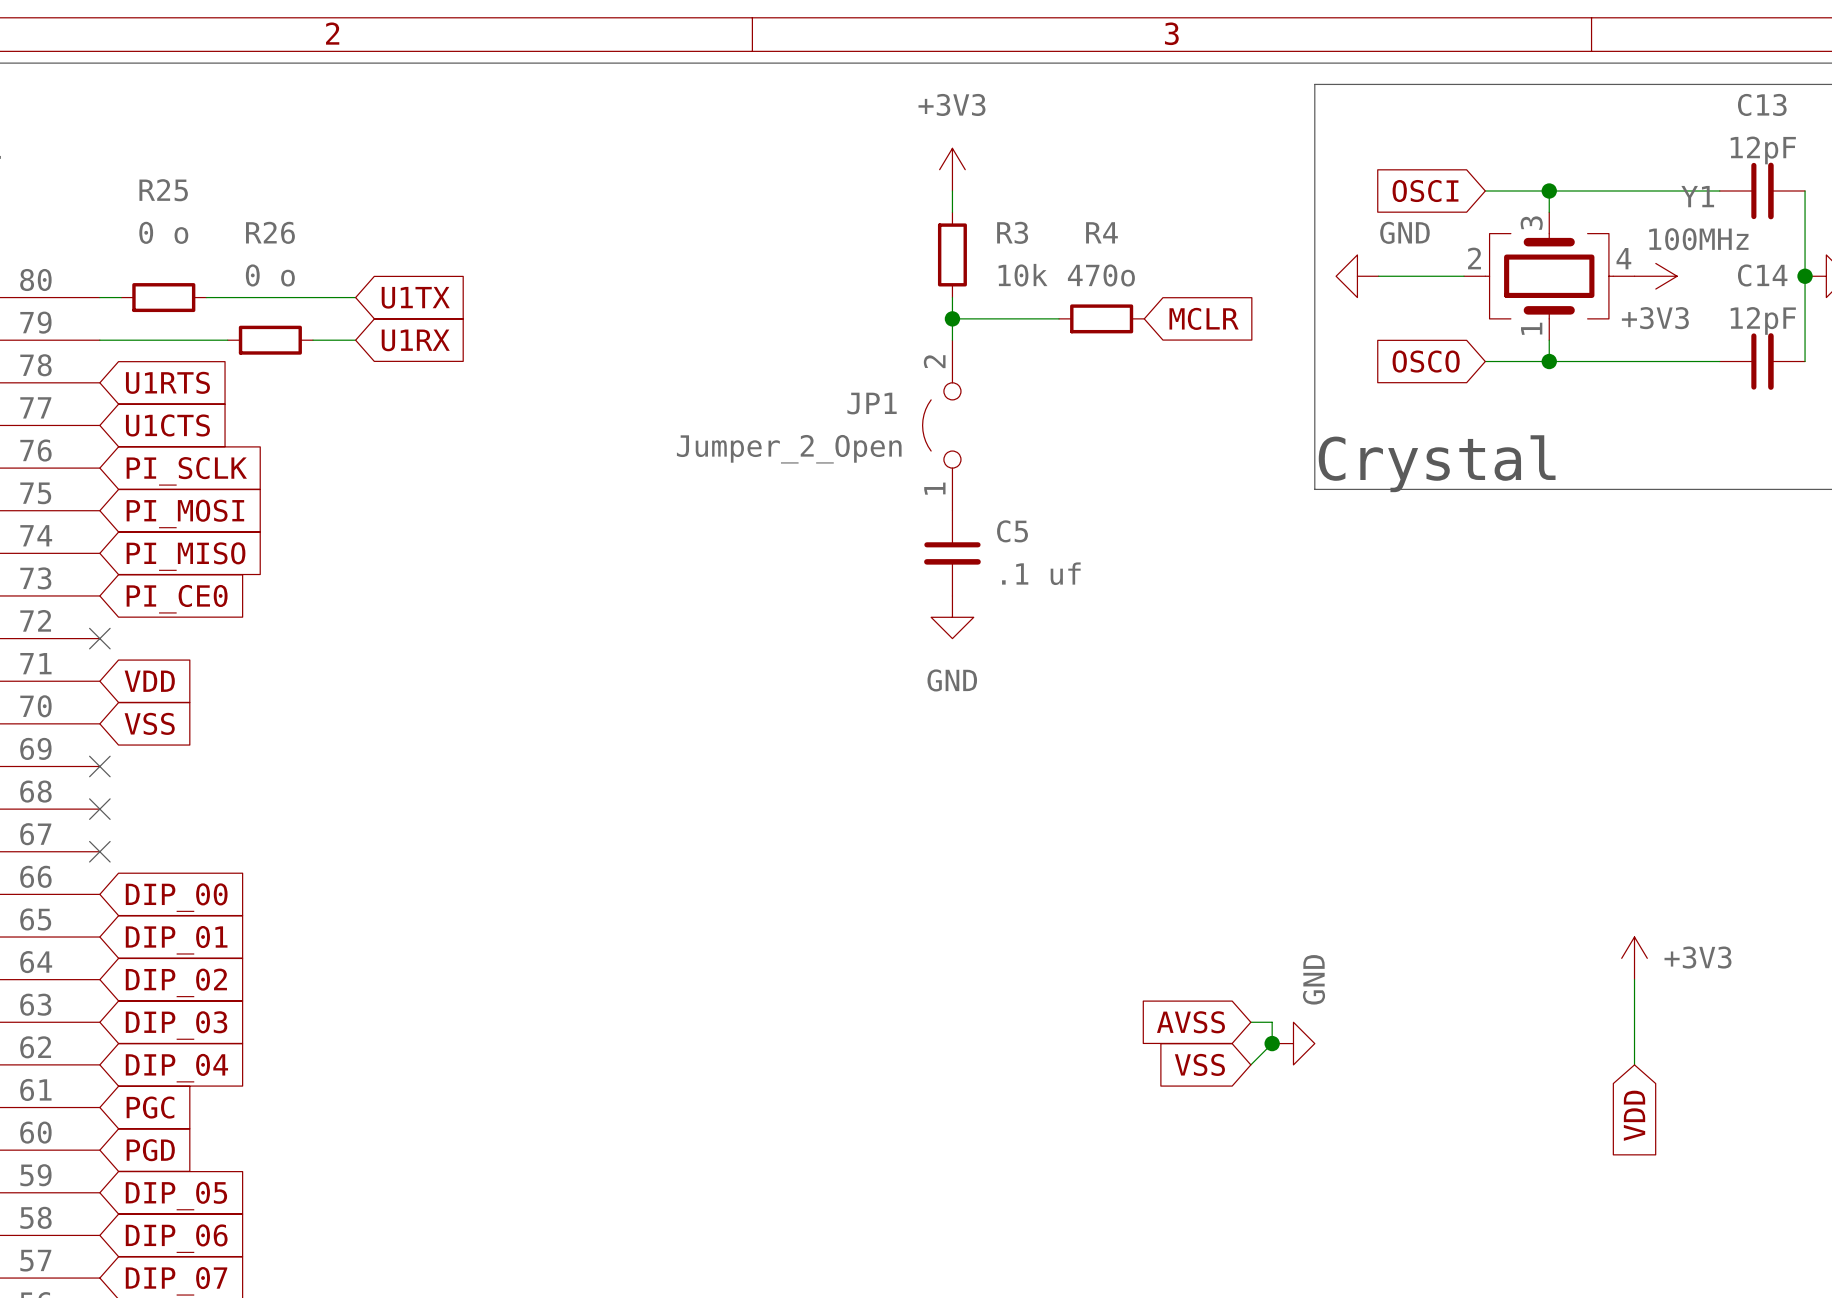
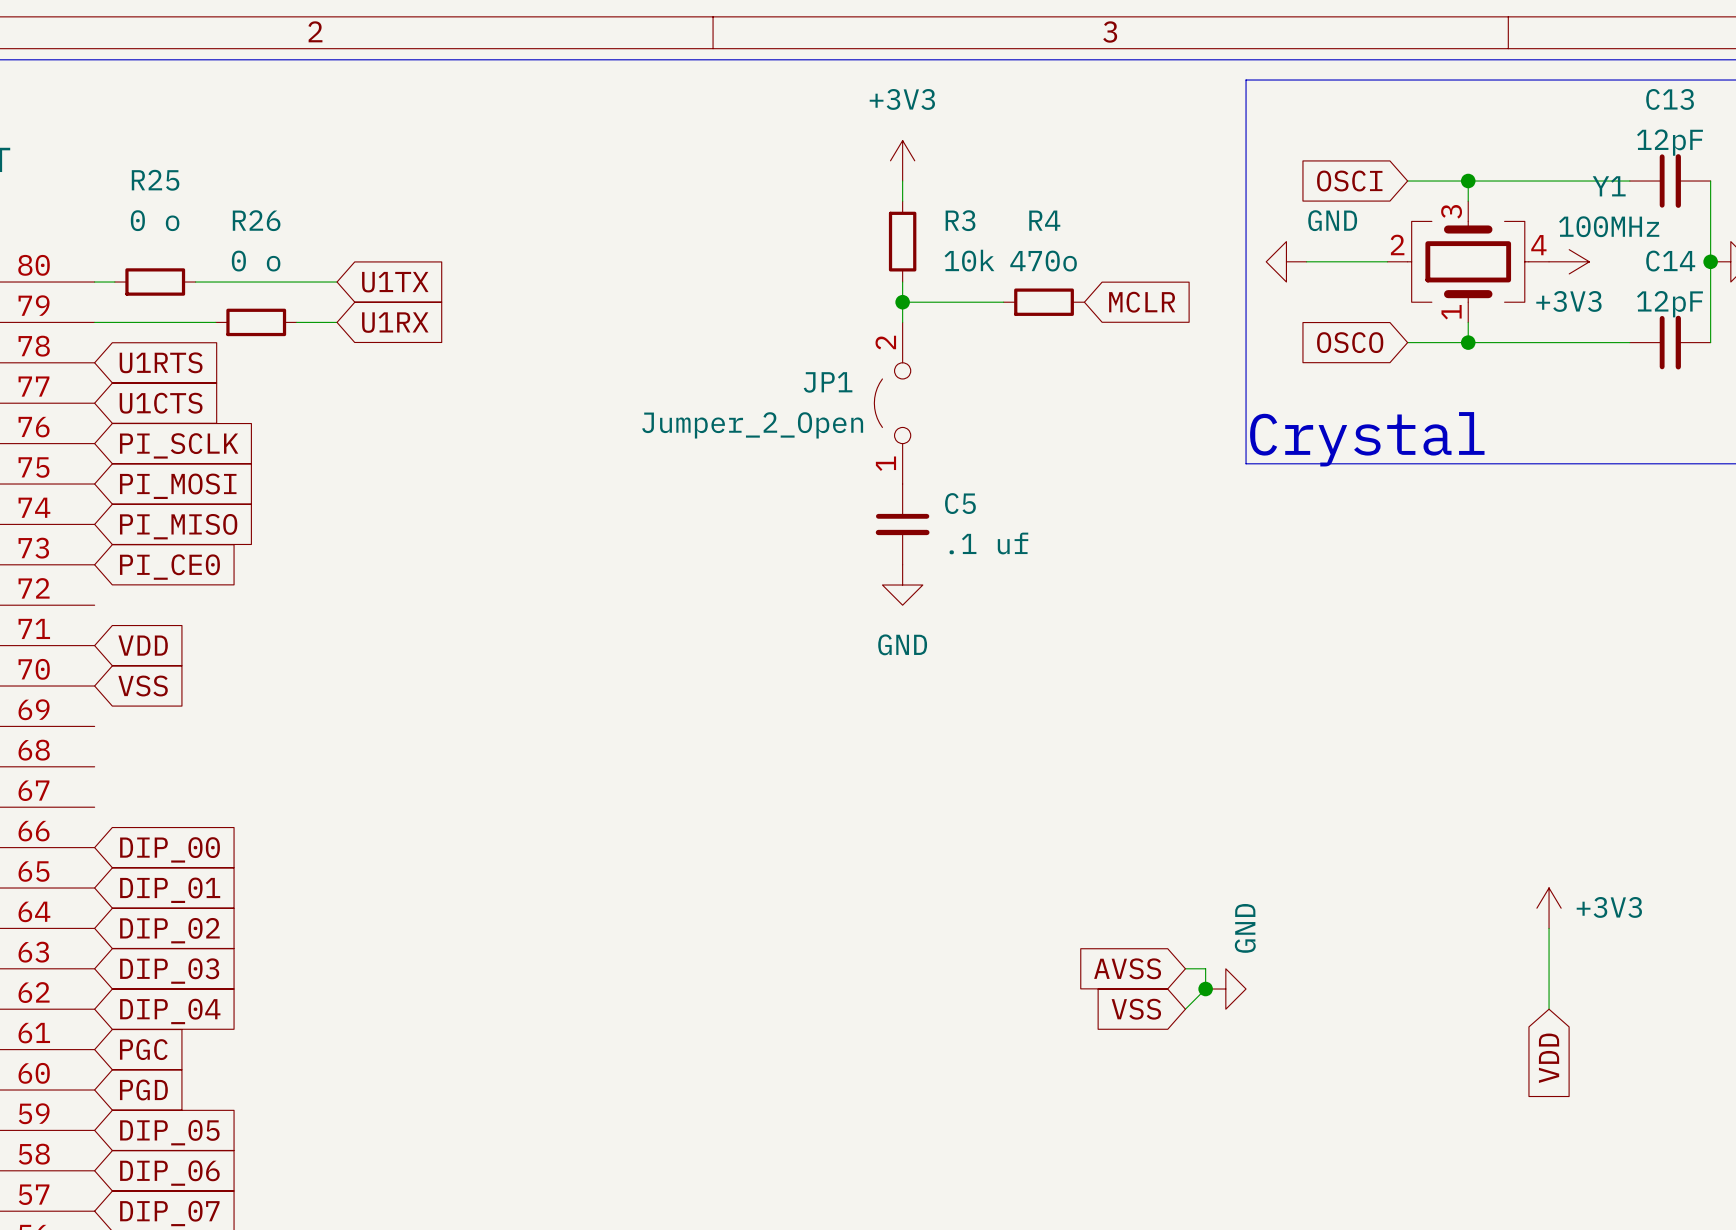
no-connect mark: (99, 638) -> none
no-connect mark: (99, 766) -> none
no-connect mark: (99, 809) -> none
no-connect mark: (99, 851) -> none

